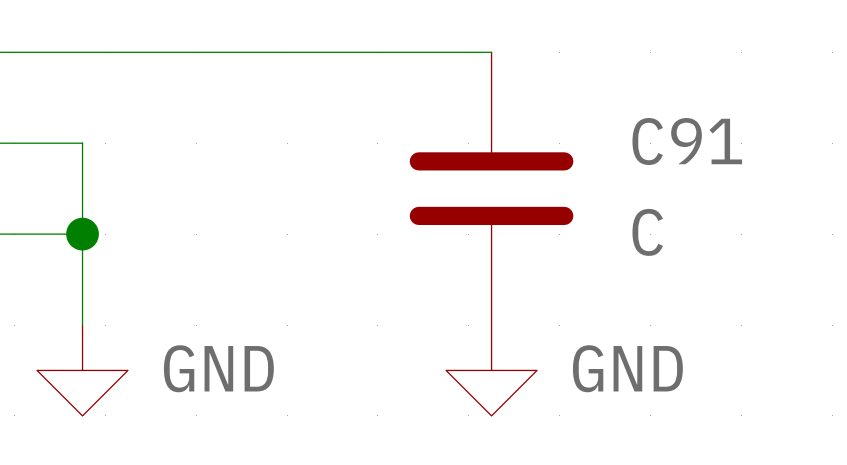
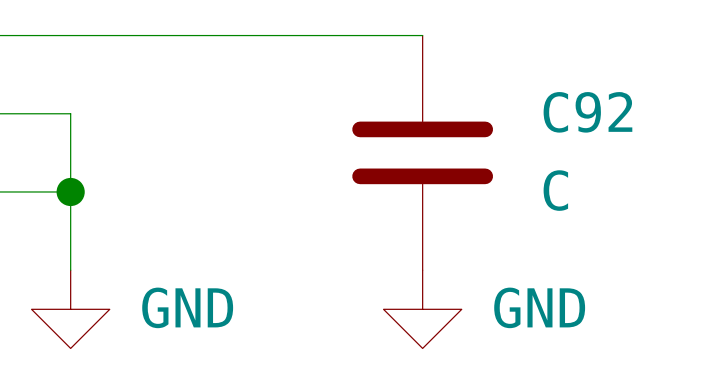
C91 name: C91 (687, 141) -> C92 (587, 112)

